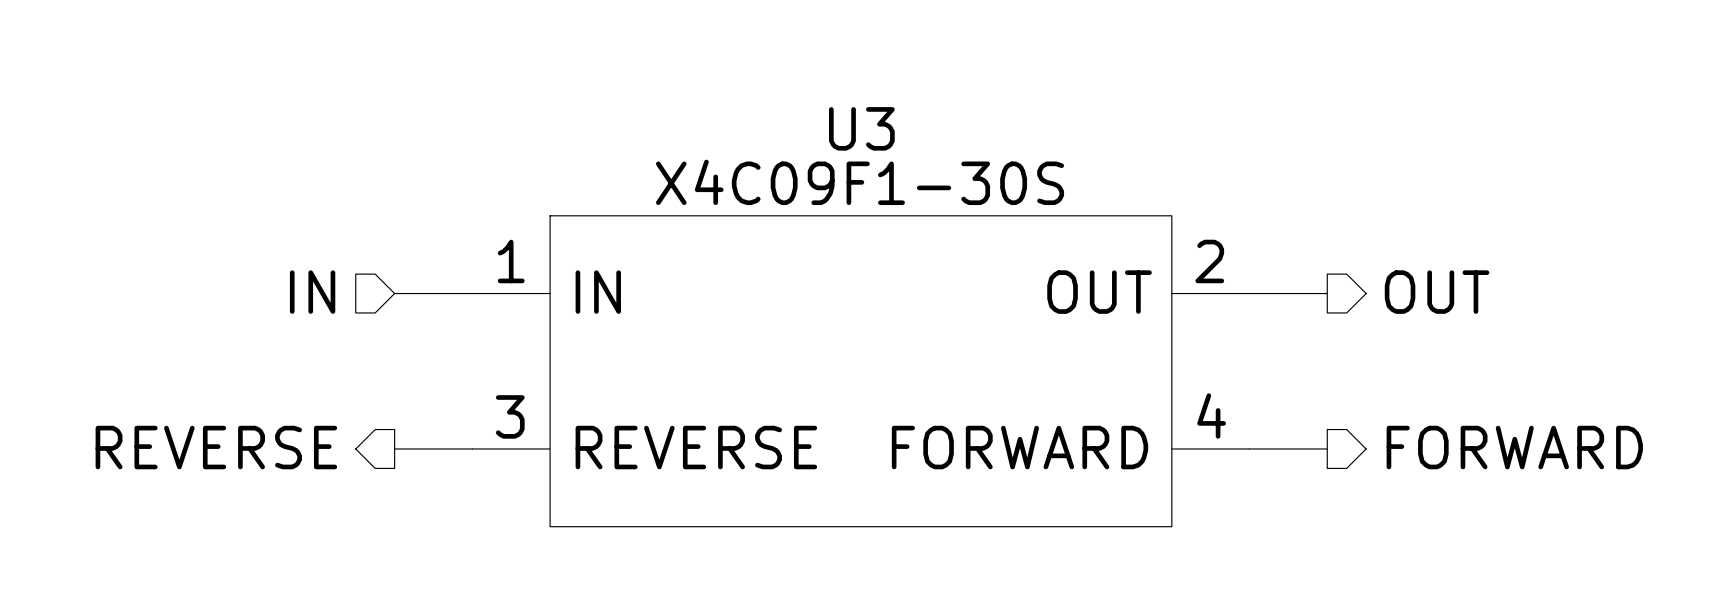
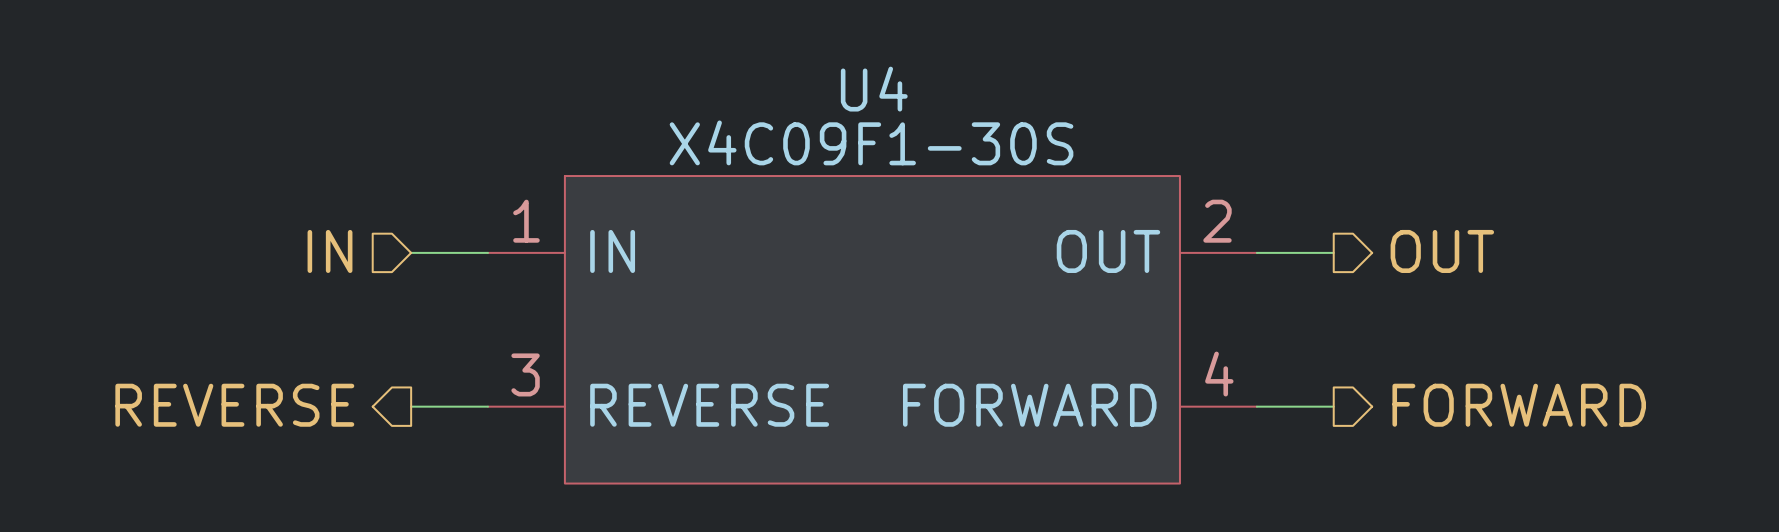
U3 name: U3 (861, 128) -> U4 (874, 89)

